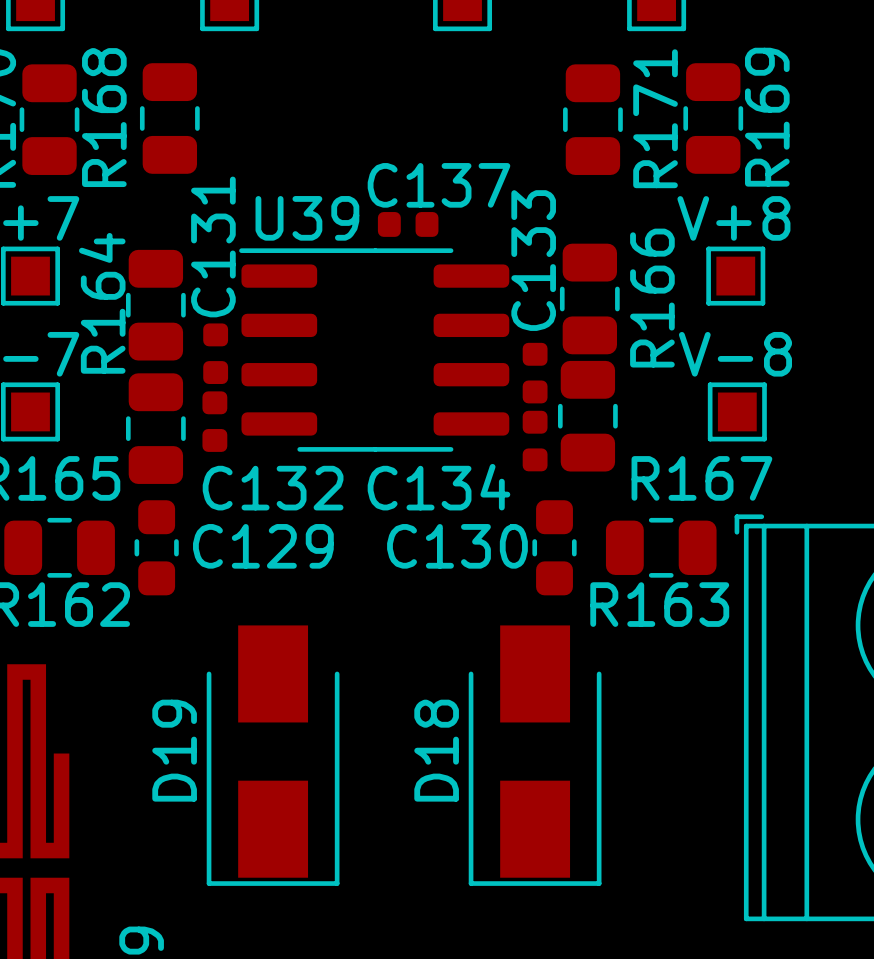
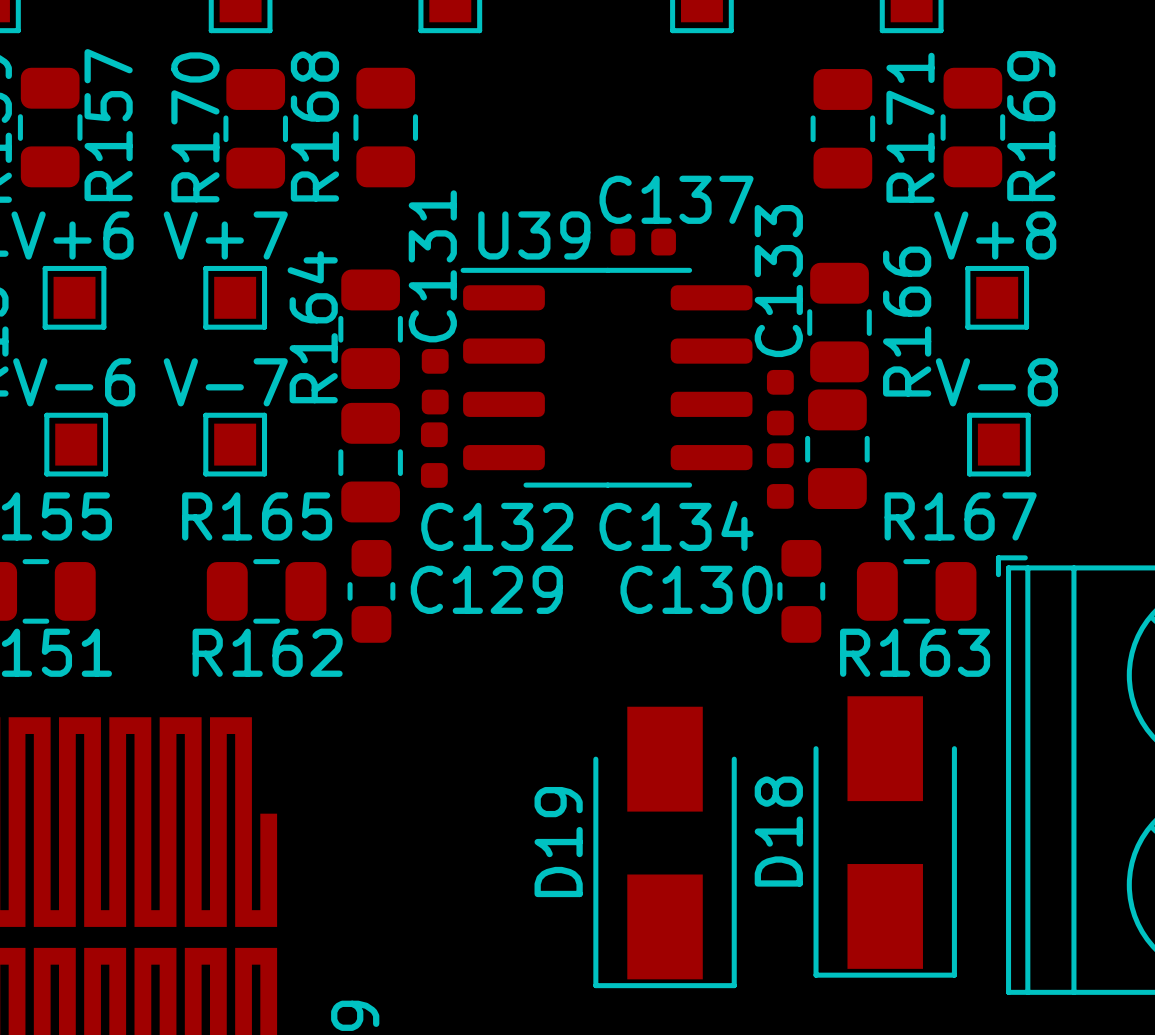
D19 position: (273, 755) -> (665, 847)
D18 position: (535, 755) -> (885, 836)

